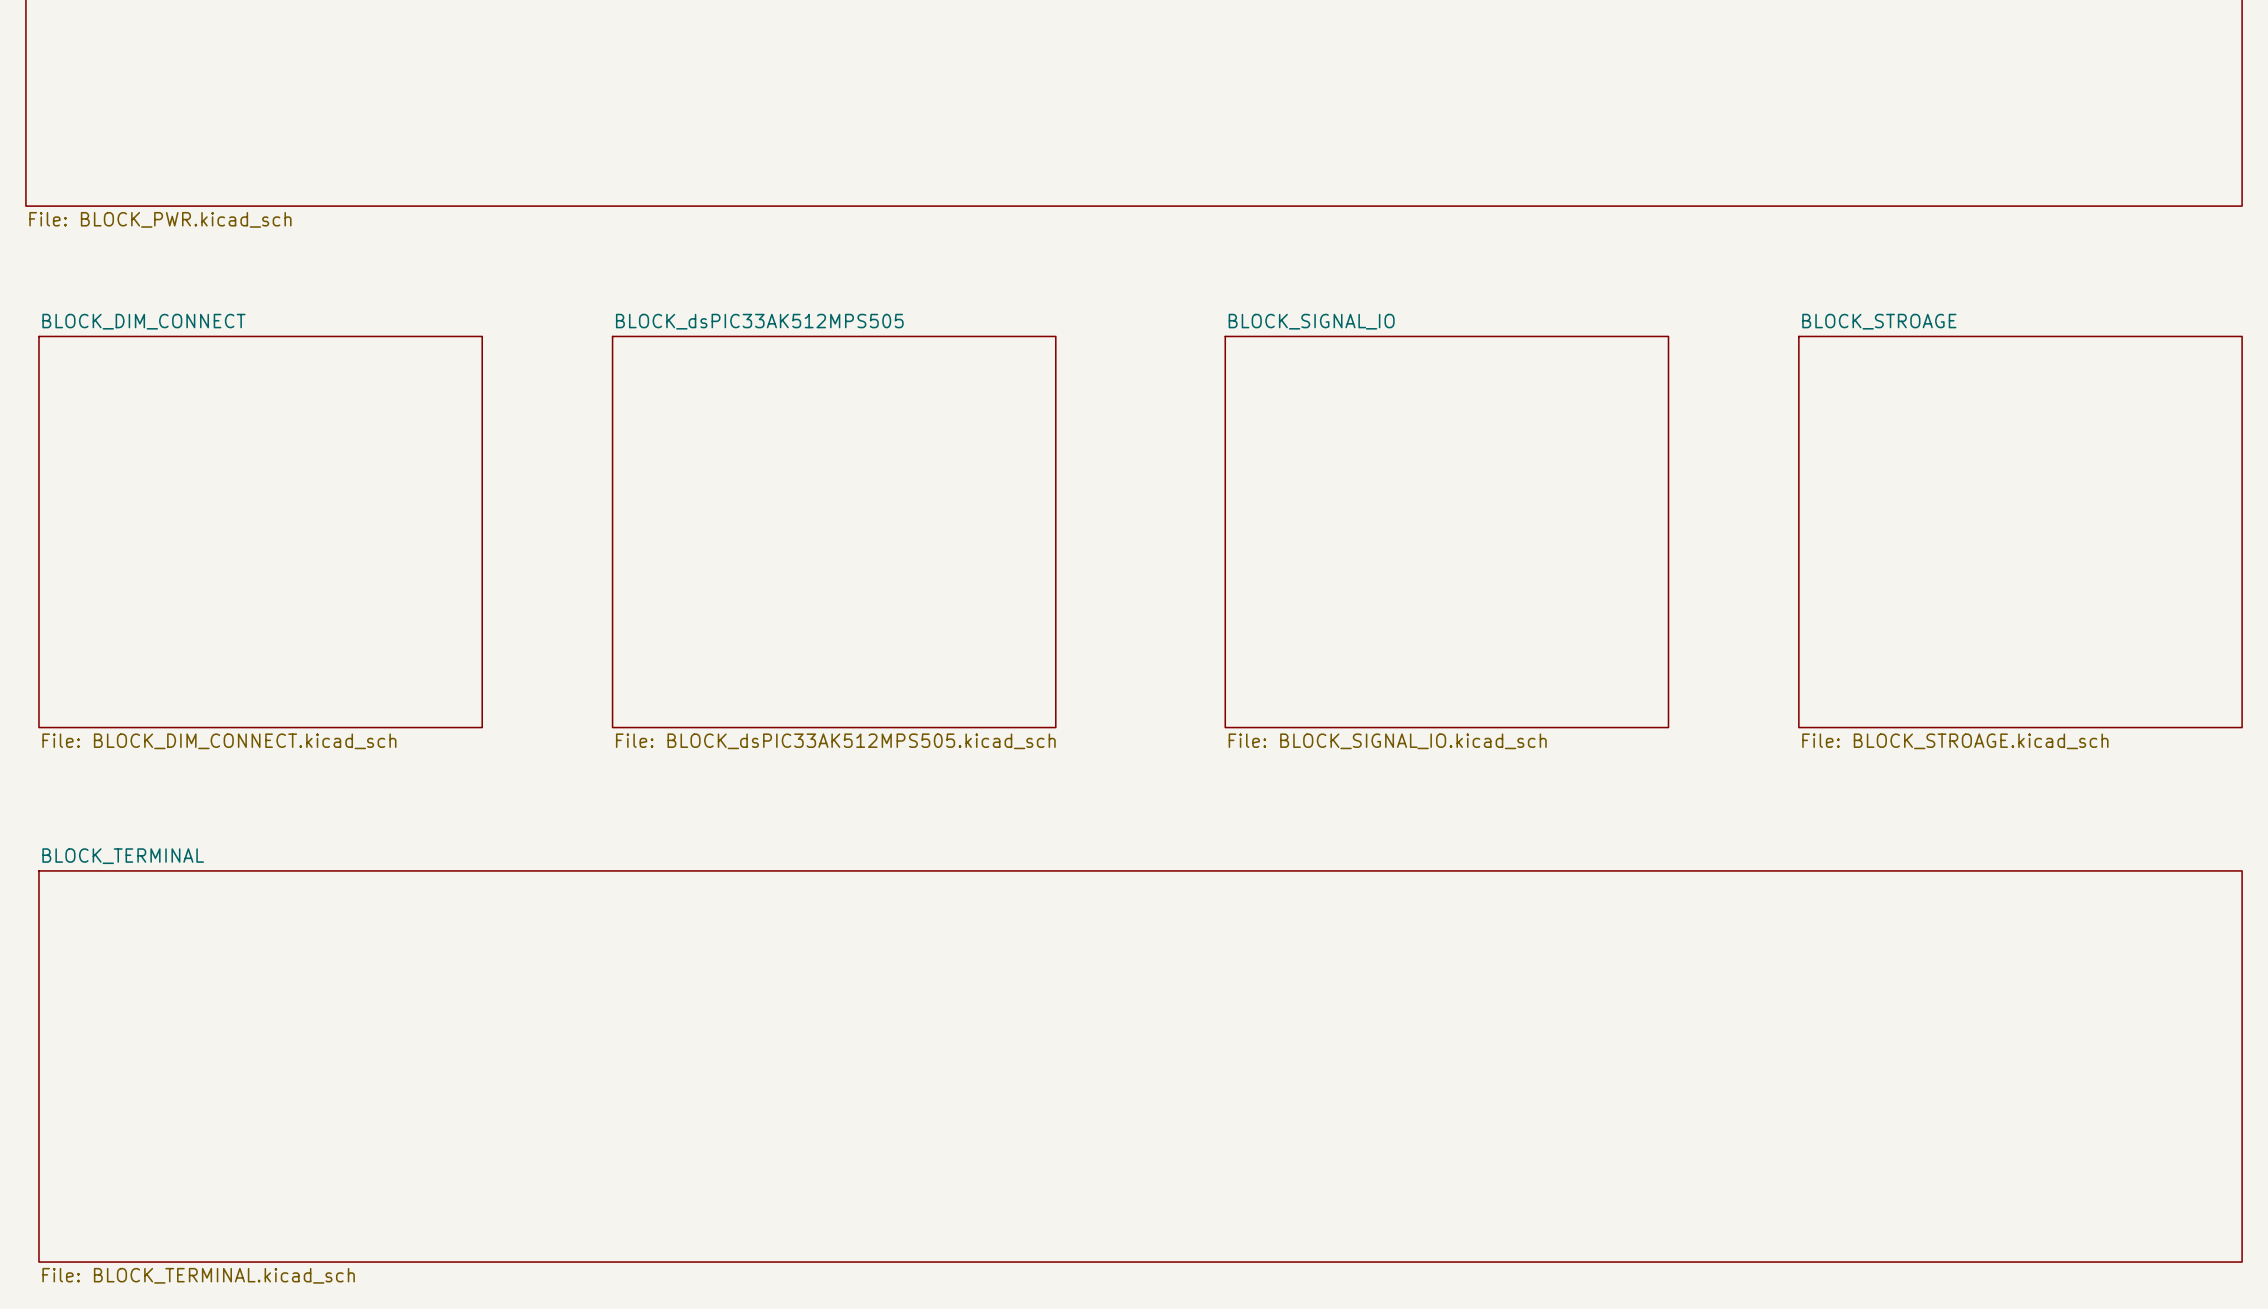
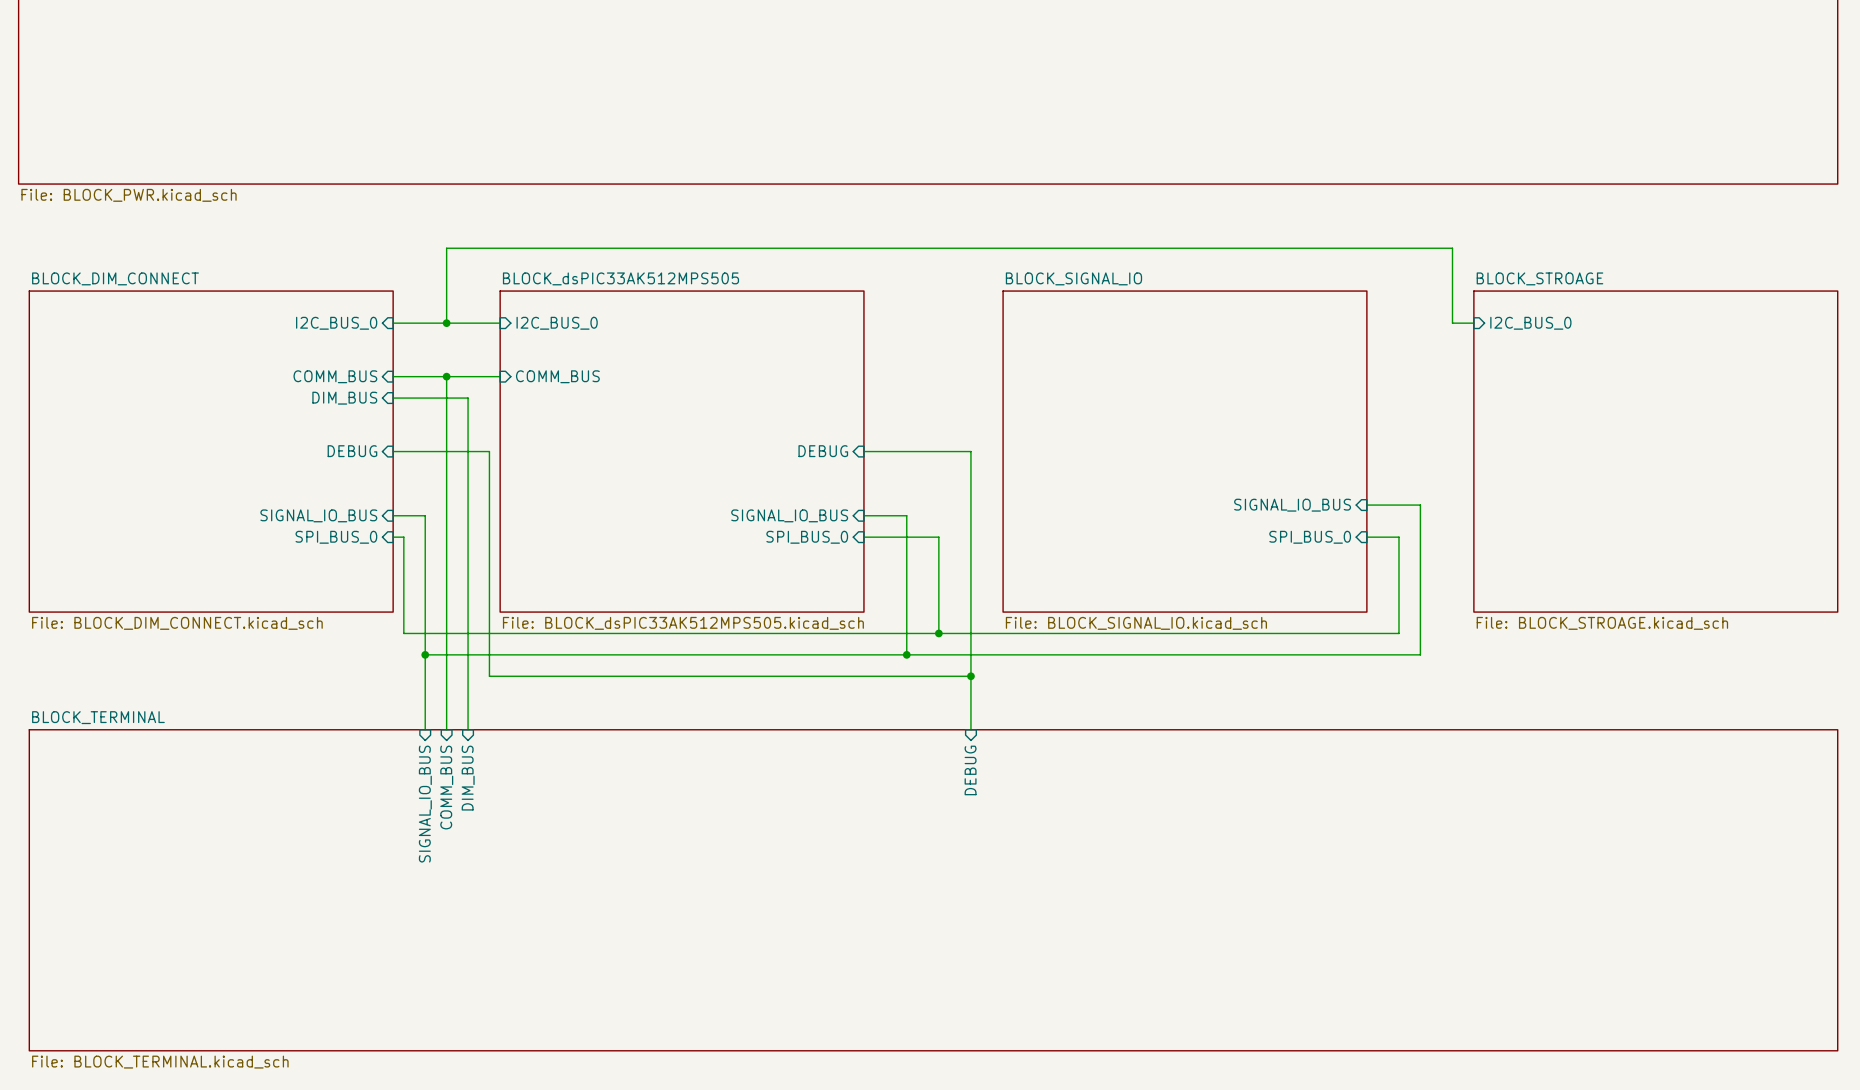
sheet pin: none -> I2C_BUS_0 (336, 323)
wire: none -> (393, 323) (500, 323)
wire: none -> (446, 323) (446, 248) (1452, 248) (1452, 323) (1473, 323)
junction: none -> (446, 323)
sheet pin: none -> I2C_BUS_0 (557, 323)
sheet pin: none -> I2C_BUS_0 (1530, 323)
sheet pin: none -> COMM_BUS (335, 376)
wire: none -> (393, 376) (500, 376)
wire: none -> (446, 376) (446, 729)
junction: none -> (446, 376)
sheet pin: none -> COMM_BUS (557, 376)
sheet pin: none -> DIM_BUS (344, 398)
wire: none -> (393, 398) (468, 398) (468, 729)
sheet pin: none -> DEBUG (352, 451)
sheet pin: none -> DEBUG (823, 451)
wire: none -> (393, 451) (489, 451) (489, 676) (970, 676)
wire: none -> (863, 451) (970, 451) (970, 729)
sheet pin: none -> SIGNAL_IO_BUS (1292, 505)
wire: none -> (1366, 505) (1420, 505) (1420, 654) (425, 654)
sheet pin: none -> SIGNAL_IO_BUS (318, 515)
wire: none -> (393, 515) (425, 515) (425, 729)
sheet pin: none -> SIGNAL_IO_BUS (789, 515)
wire: none -> (863, 515) (906, 515) (906, 654)
sheet pin: none -> SPI_BUS_0 (336, 537)
wire: none -> (393, 537) (403, 537) (403, 633) (1398, 633) (1398, 537) (1366, 537)
sheet pin: none -> SPI_BUS_0 (807, 537)
wire: none -> (863, 537) (938, 537) (938, 633)
sheet pin: none -> SPI_BUS_0 (1310, 537)
junction: none -> (938, 633)
junction: none -> (425, 654)
junction: none -> (906, 654)
junction: none -> (970, 676)
sheet pin: none -> DEBUG (970, 770)
sheet pin: none -> DIM_BUS (468, 778)
sheet pin: none -> COMM_BUS (446, 787)
sheet pin: none -> SIGNAL_IO_BUS (425, 804)

